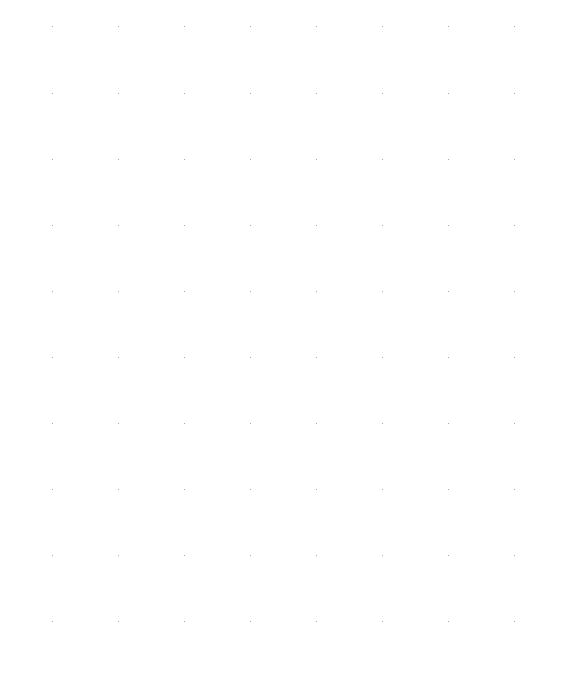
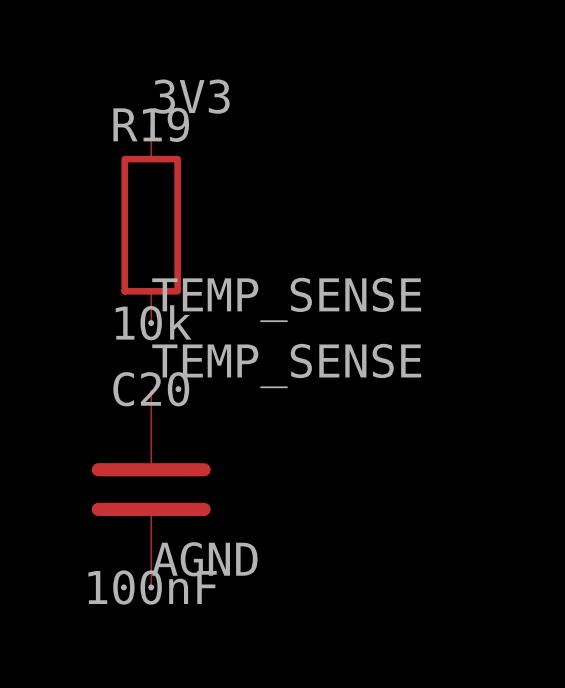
label: none -> 3V3 (191, 96)
R19: none -> 10k (151, 225)
label: none -> TEMP_SENSE (286, 299)
label: none -> TEMP_SENSE (286, 366)
C20: none -> 100nF (151, 489)
label: none -> AGND (204, 559)

